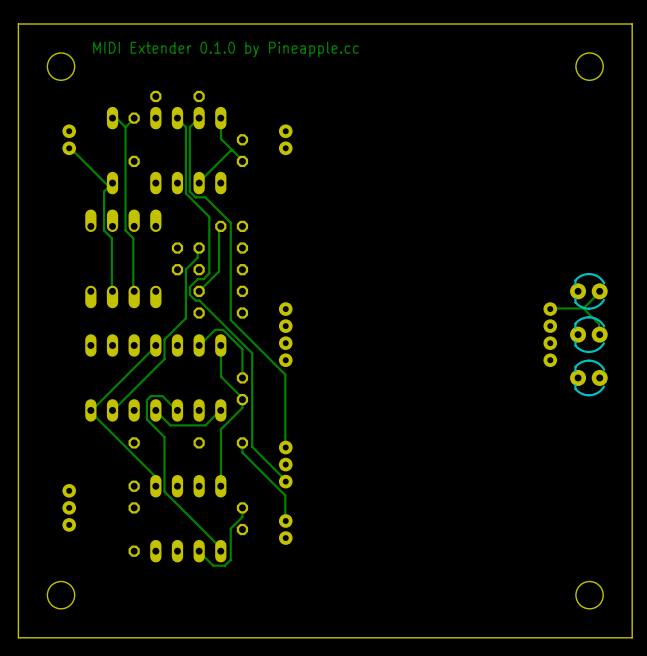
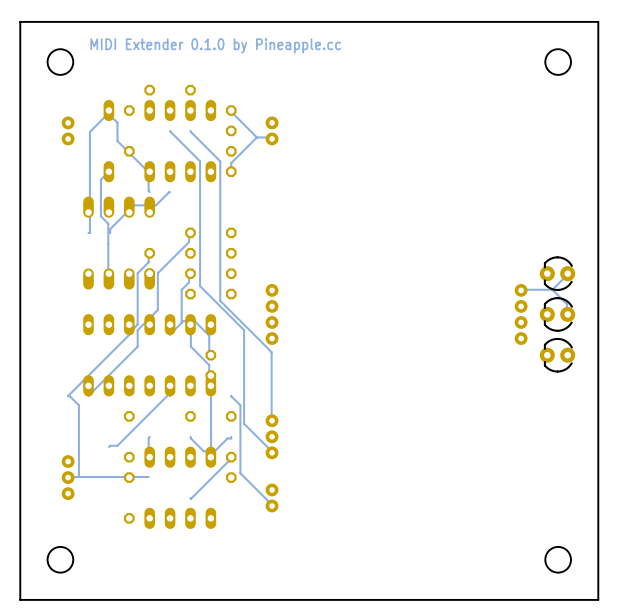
track: (112, 118) (117, 119) (125, 127) -> none
track: (134, 118) (125, 127) -> none
track: (177, 118) (185, 127) (185, 193) (209, 216) -> (170, 130) (200, 161) (200, 203)
track: (199, 118) (189, 127) (189, 191) (195, 197) (205, 197) (230, 222) -> (190, 130) (220, 161) (220, 209)
track: (220, 118) (221, 138) (242, 161) -> none
track: none -> (231, 110) (256, 137)
track: (125, 127) (125, 230) (133, 238) (134, 291) -> none
part: none -> (231, 120)
track: none -> (256, 137) (272, 138)
track: none -> (256, 137) (231, 163) (231, 171)
track: (69, 148) (109, 185) -> none
track: (232, 150) (199, 183) -> none
part: (242, 150) -> none
part: none -> (231, 161)
track: none -> (149, 192) (148, 172) (117, 141) (117, 122) (111, 117) (104, 117) (89, 131) (88, 232)
track: none -> (170, 192) (156, 205) (133, 205) (110, 229) (108, 232)
track: (220, 226) (219, 226) (219, 271) (199, 291) -> (181, 322) (181, 289) (189, 282) (190, 273)
part: (231, 226) -> none
part position: (177, 258) -> (149, 263)
track: none -> (149, 253) (148, 262) (137, 273) (137, 324) (68, 396) (78, 405) (78, 476)
track: (185, 269) (185, 318) (164, 339) (164, 359) (112, 410) -> (178, 253) (157, 273) (157, 309) (137, 330) (137, 346) (88, 396)
track: (209, 273) (203, 279) (197, 279) (189, 287) (189, 294) (195, 300) (199, 300) (252, 353) (252, 431) -> (200, 256) (200, 286) (244, 330) (244, 423)
track: (155, 345) (90, 411) (154, 476) -> (149, 436) (148, 447)
track: (199, 345) (215, 329) (222, 329) (242, 349) (242, 377) -> none
track: (220, 345) (221, 376) (242, 398) (242, 407) (221, 429) -> (190, 334) (190, 346) (209, 365) (211, 403)
track: none -> (170, 334) (183, 320) (194, 320) (209, 335) (209, 354) (210, 355)
part position: (242, 388) -> (210, 365)
track: (177, 410) (162, 396) (150, 396) (146, 400) (146, 419) (164, 437) (164, 491) (219, 546) (220, 551) -> none
track: (220, 410) (205, 425) (170, 425) (155, 410) -> none
track: none -> (170, 396) (168, 394) (117, 445) (108, 446)
track: none -> (231, 396) (240, 405)
track: (242, 442) (242, 452) (285, 495) (285, 521) -> none
track: (252, 446) (256, 450) -> (240, 420) (240, 473) (272, 506)
track: none -> (231, 436) (214, 451) (203, 451) (190, 436)
track: none -> (231, 457) (190, 497)
track: none -> (148, 476) (68, 477)
track: (242, 507) (242, 516) (230, 528) (230, 559) (224, 565) (213, 565) (199, 551) -> none
part position: (242, 518) -> (231, 467)

